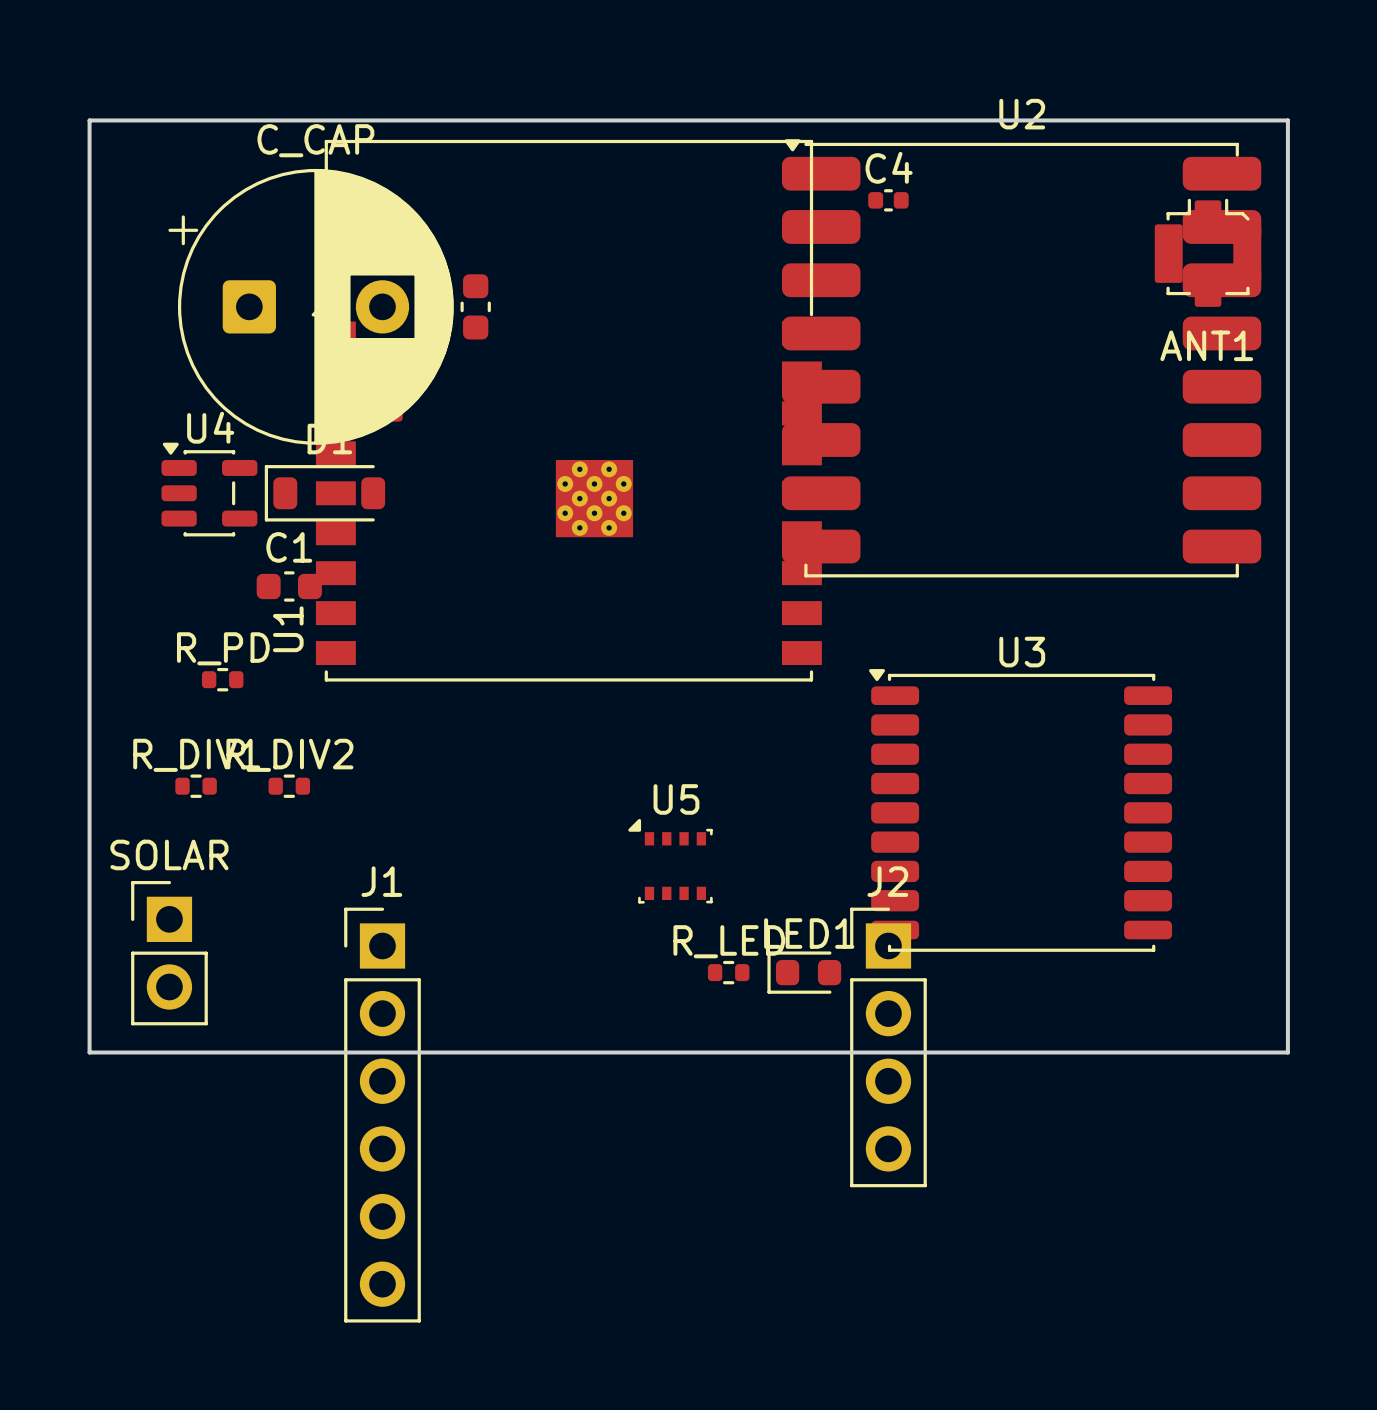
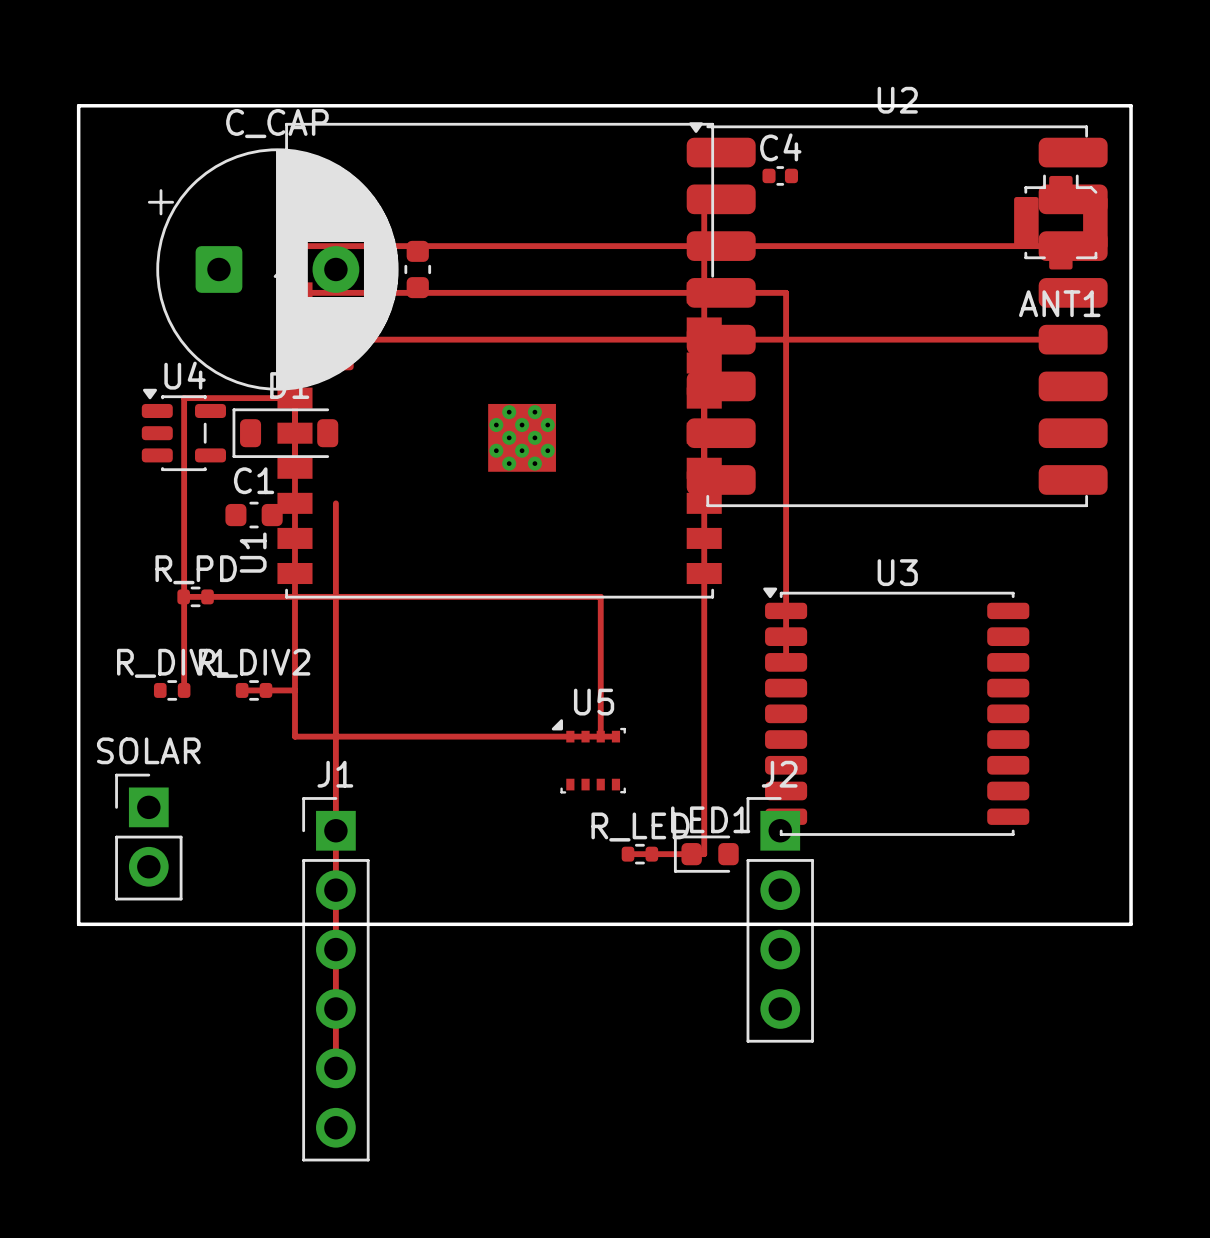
track: none -> (721, 199) (704, 199) (704, 854) (628, 854)
track: none -> (1073, 246) (294, 246) (294, 736) (615, 736)
track: none -> (294, 292) (786, 292) (786, 662)
track: none -> (294, 339) (1073, 339)
track: none -> (294, 398) (184, 398) (184, 690)
track: none -> (335, 503) (335, 1068)
track: none -> (183, 596) (600, 596) (600, 736)
track: none -> (242, 690) (294, 690)

